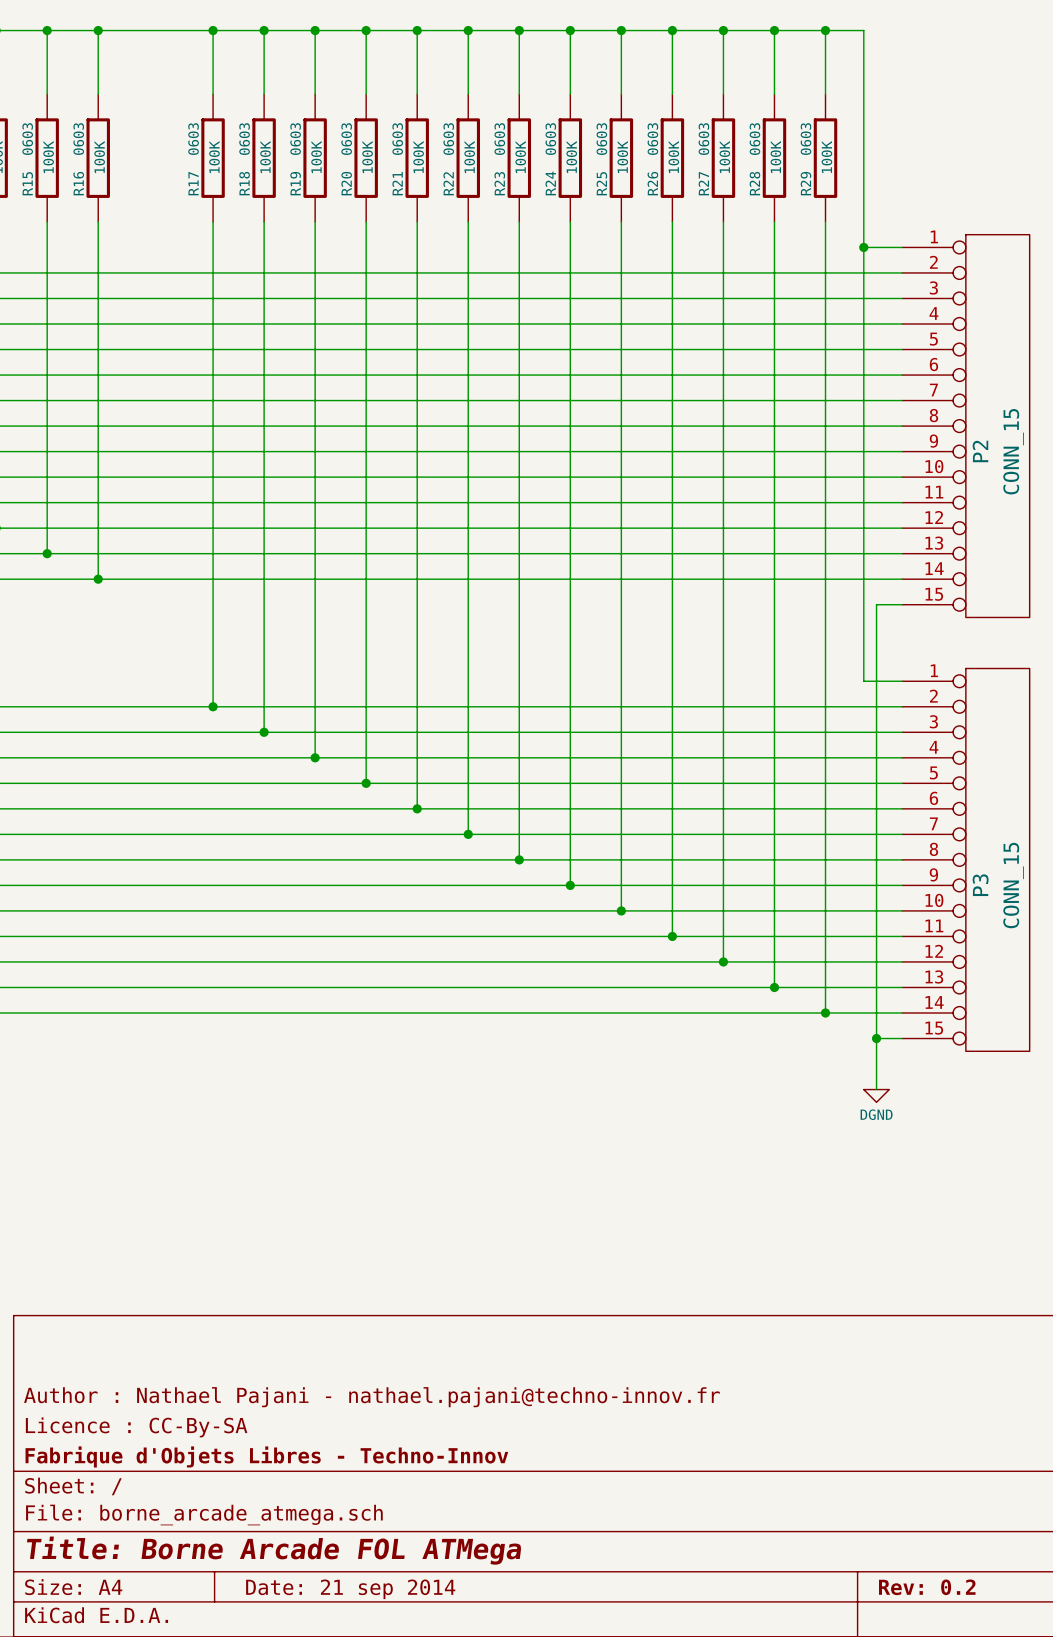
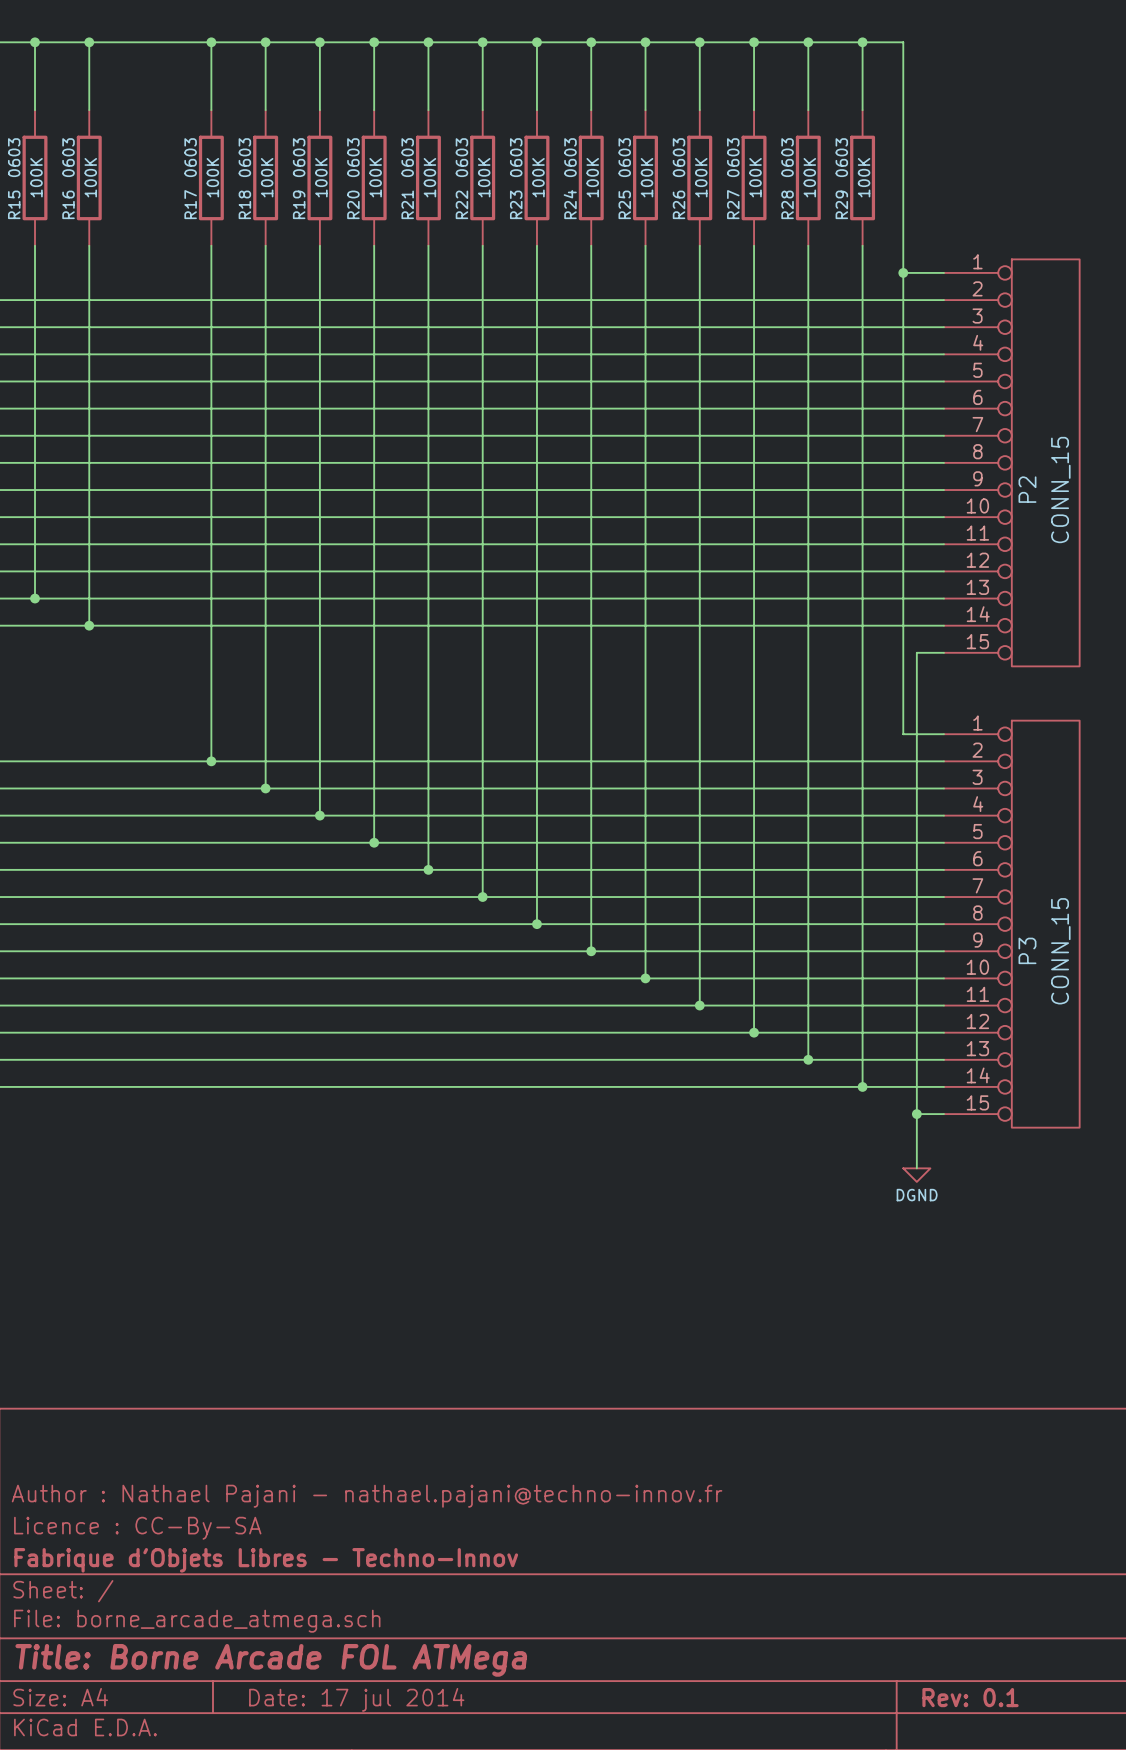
title block: Rev: 0.2 (927, 1587) -> Rev: 0.1 (970, 1697)
title block: Date: 21 sep 2014 (350, 1589) -> Date: 17 jul 2014 (356, 1699)

